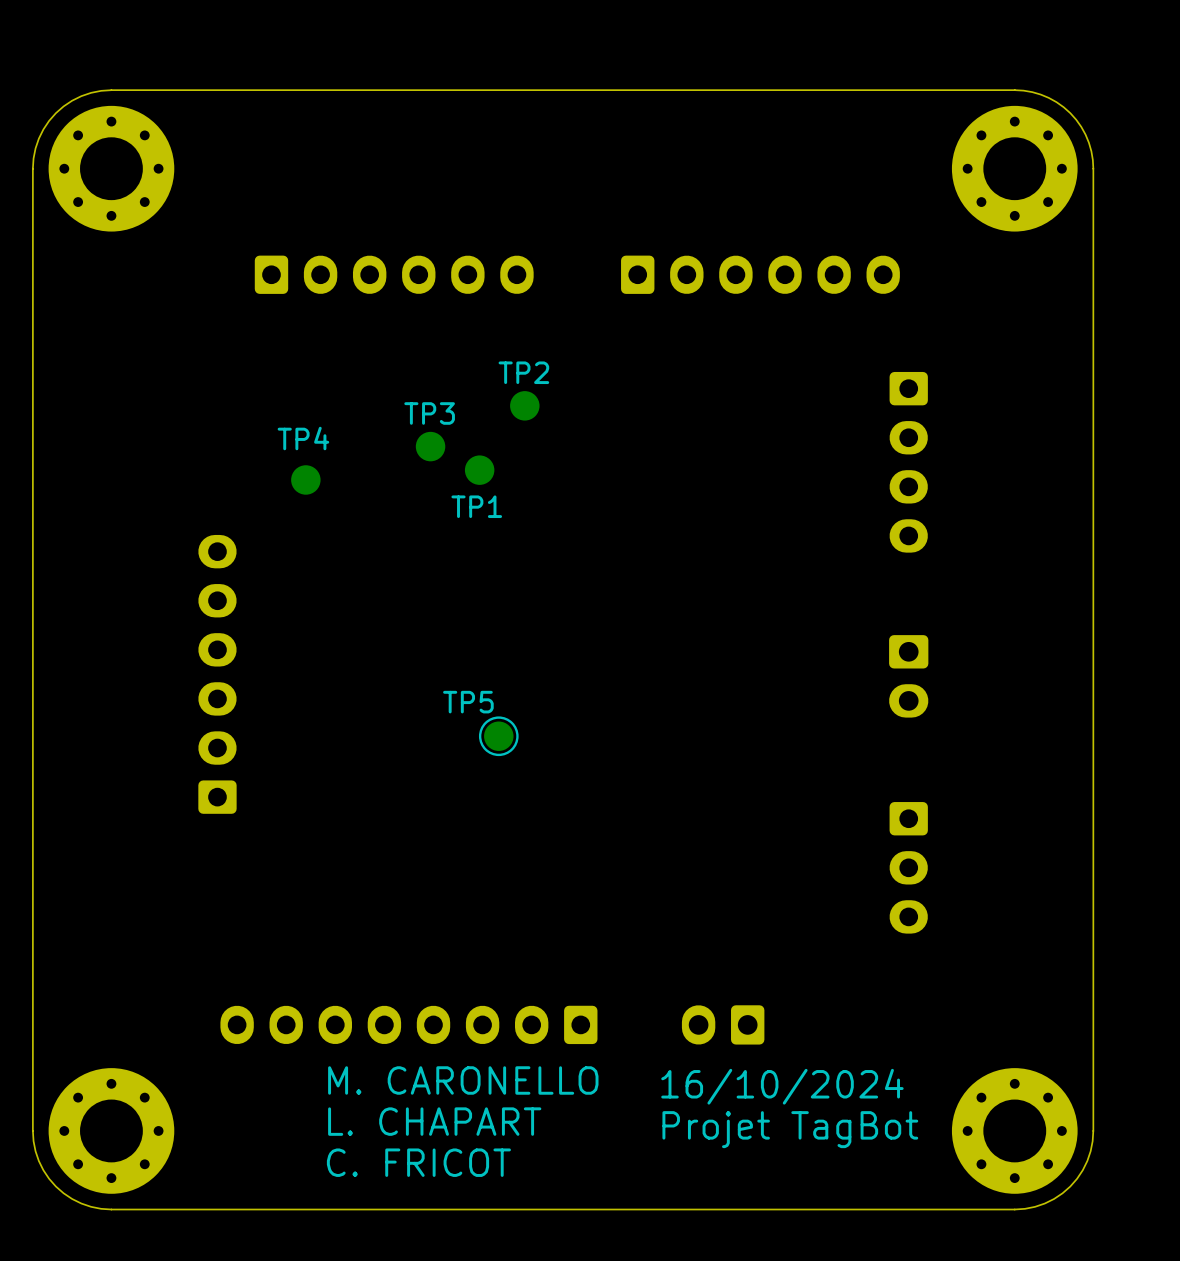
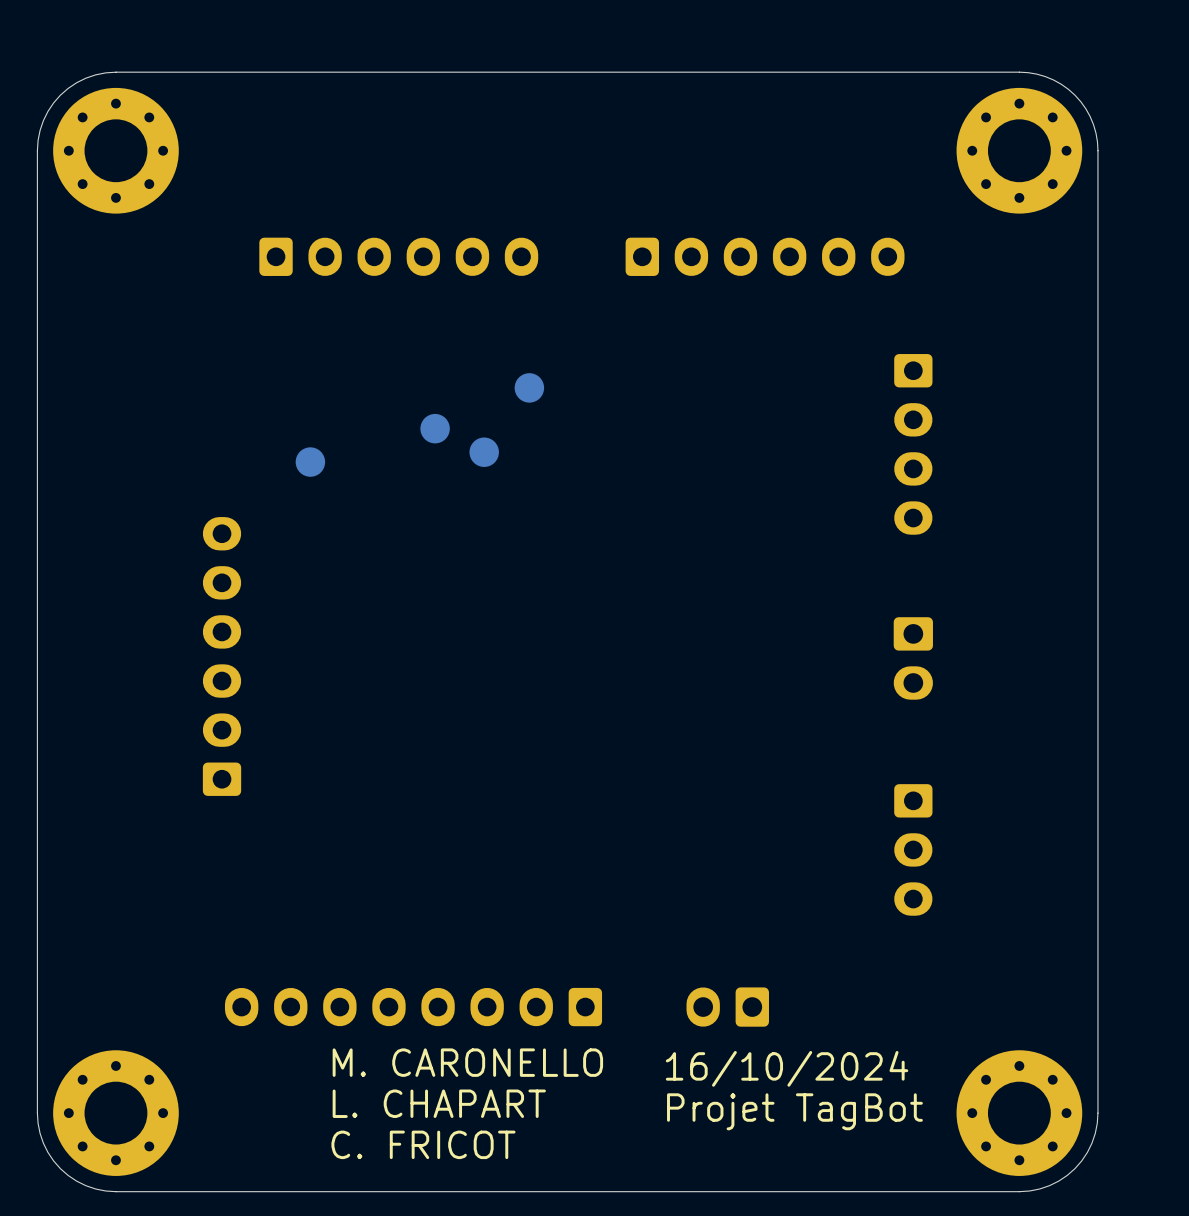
TP2 name: TP2 (523, 372) -> none
TP3 name: TP3 (429, 413) -> none
TP4 name: TP4 (303, 438) -> none
TP1 name: TP1 (476, 506) -> none
TP5: (498, 736) -> none

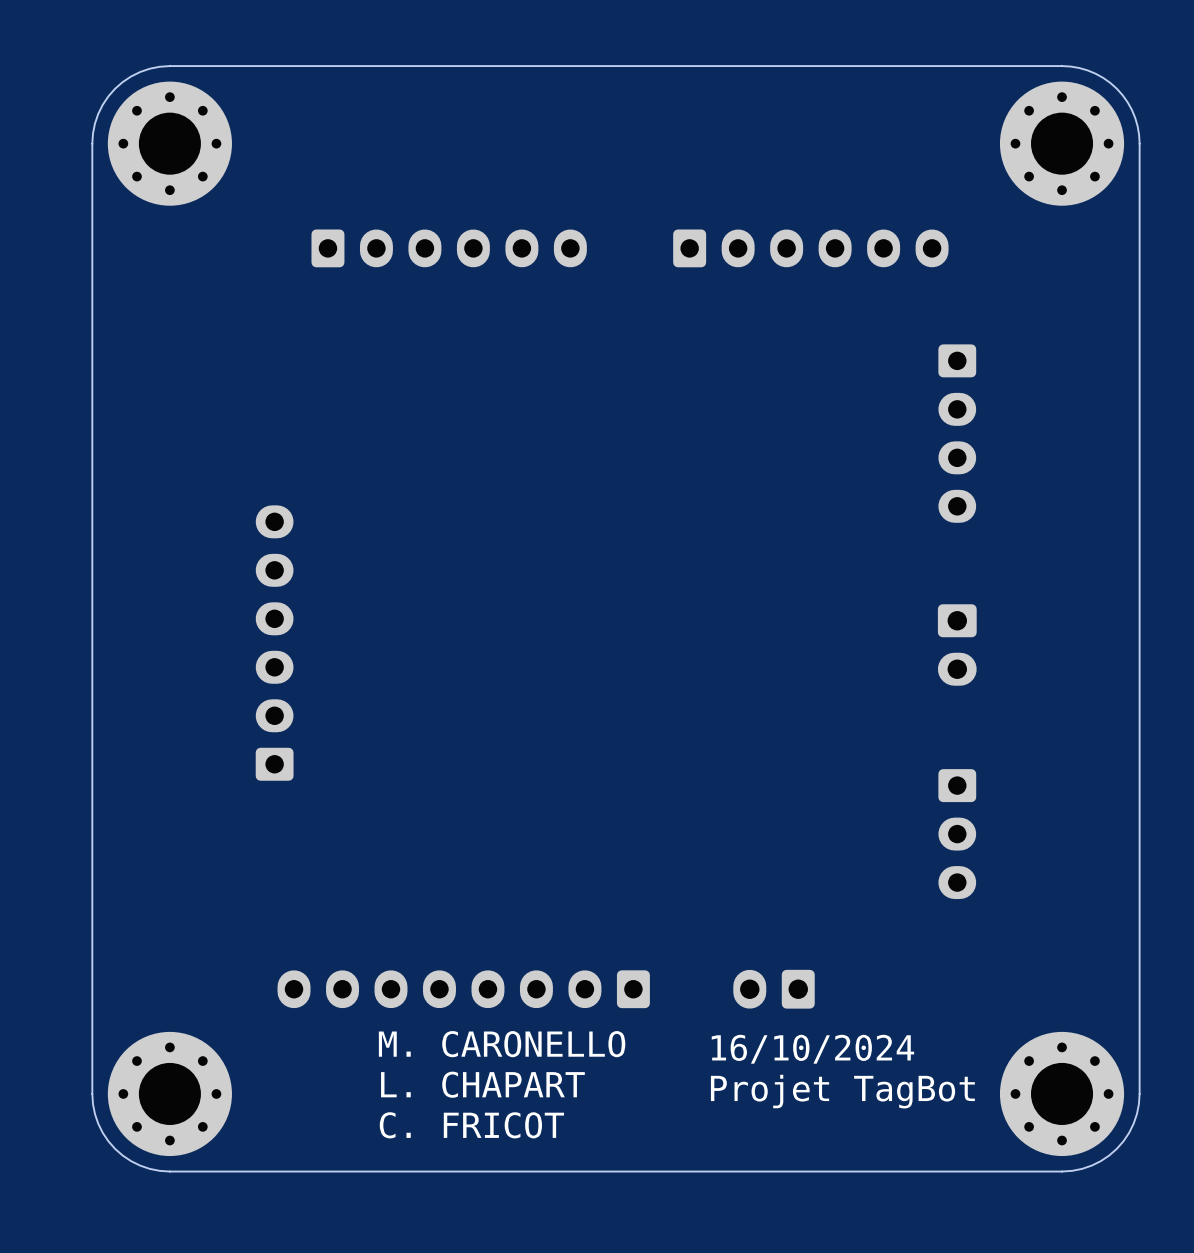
part: (529, 387) -> none
part: (435, 428) -> none
part: (484, 452) -> none
part: (310, 462) -> none

